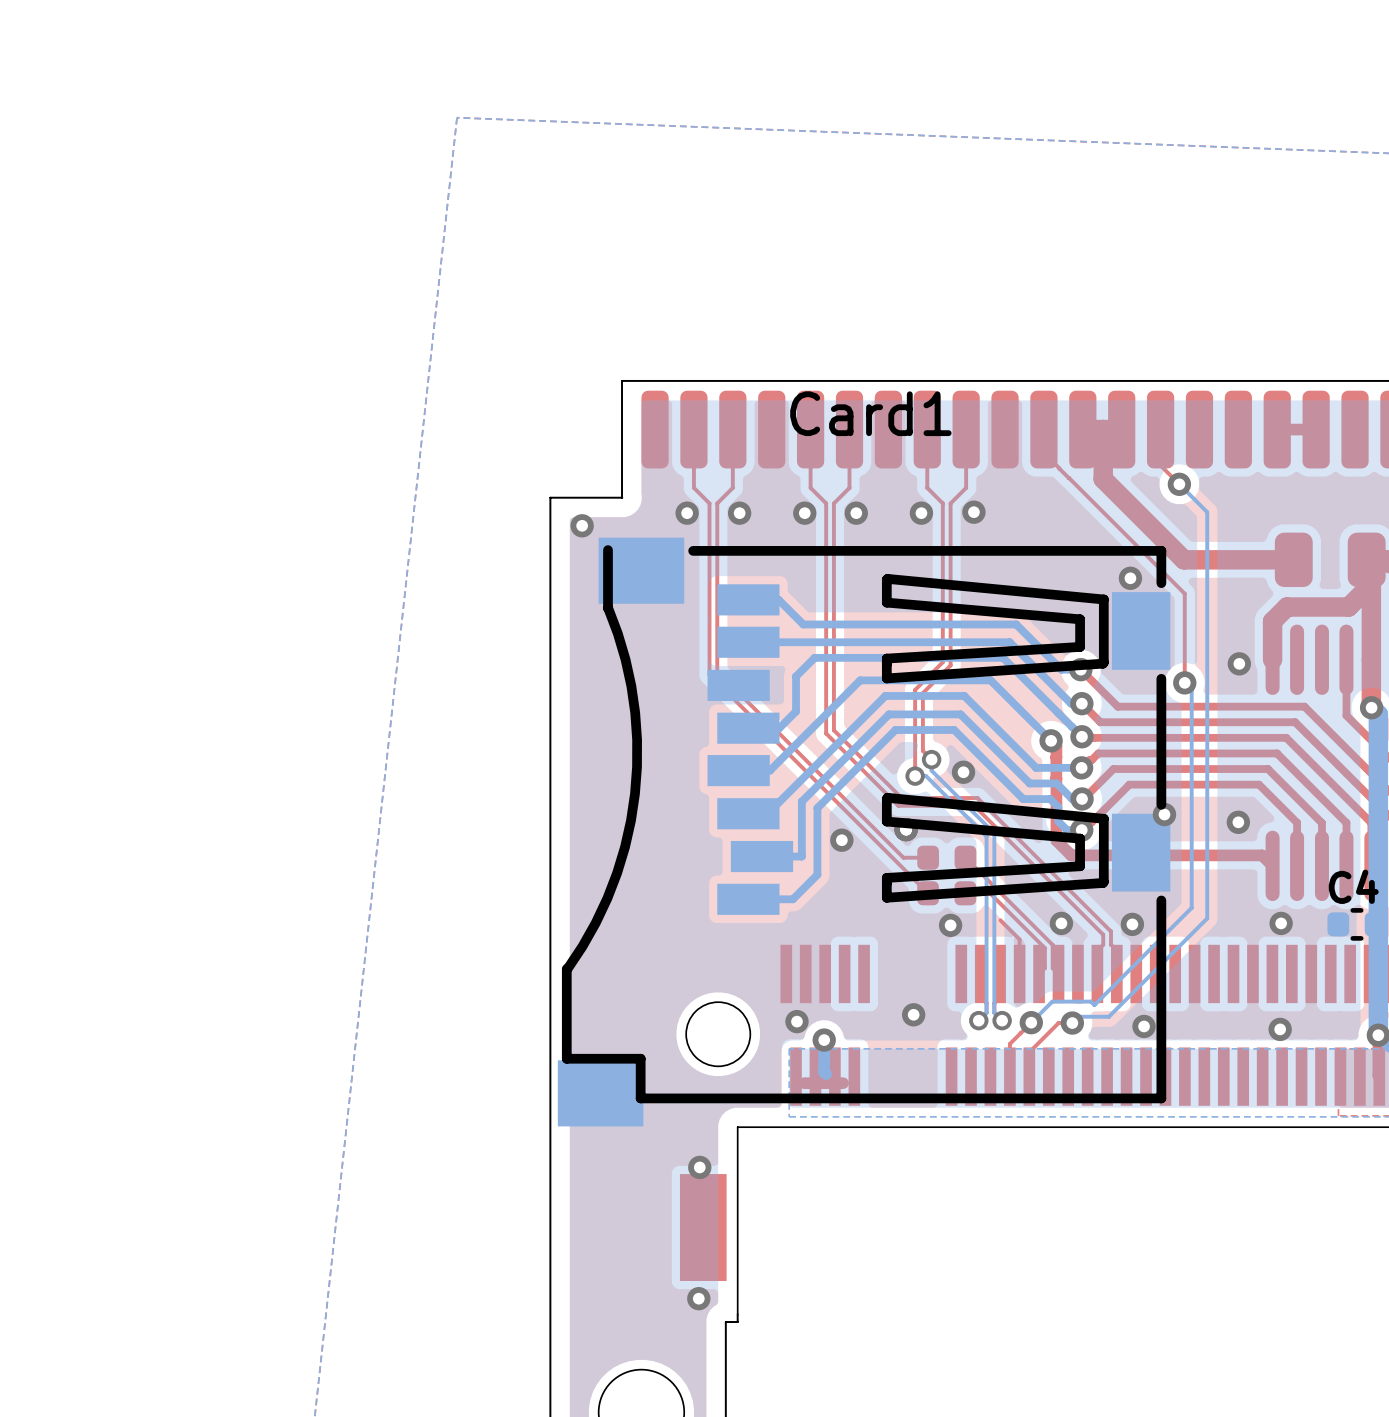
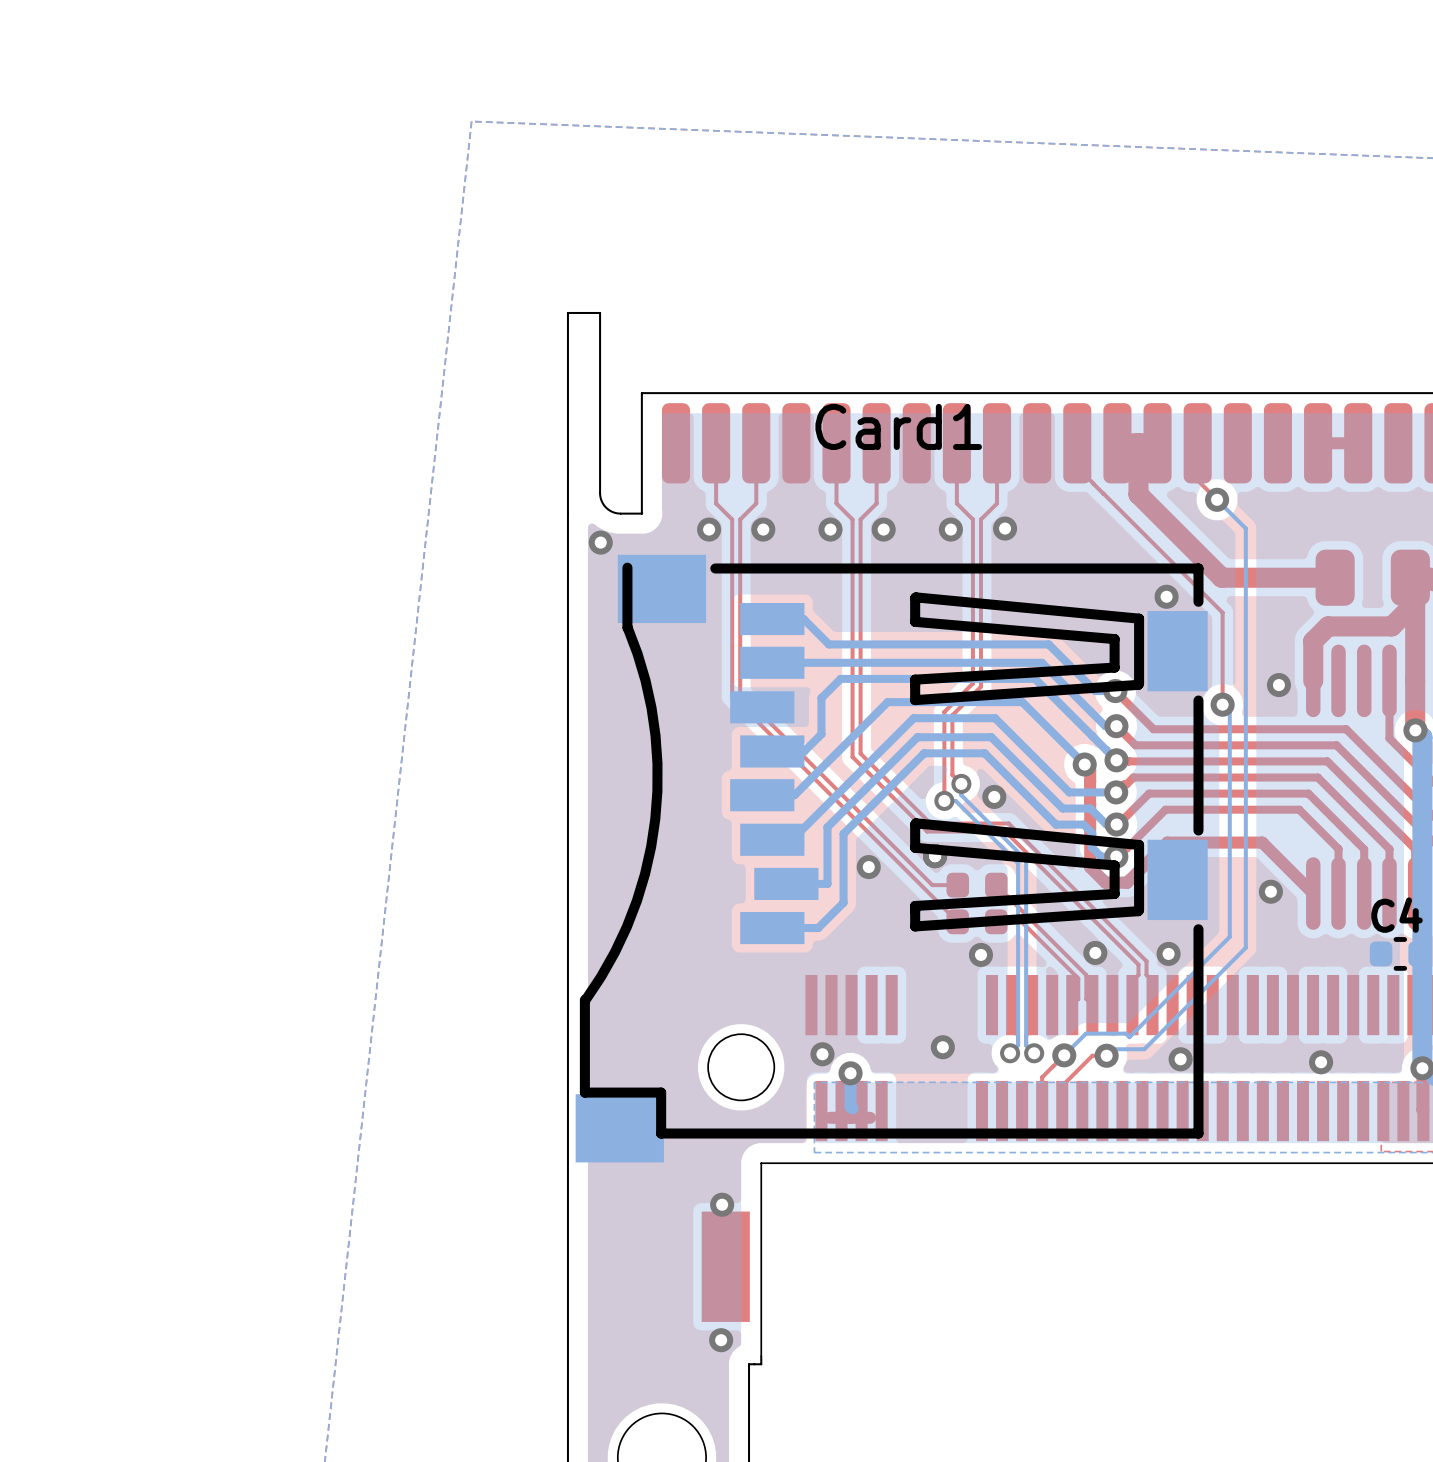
board edge: (601, 497) (550, 497) -> (620, 513) (612, 512) (606, 507) (600, 495) (600, 312) (567, 312) (567, 513)
via: (1164, 814) -> none
via: (1238, 822) -> none
top track: (1262, 855) (1092, 855) -> (1302, 882) (1262, 842) (1167, 842) (1127, 882)
via: none -> (1270, 891)
top track: (1000, 920) (1019, 939) (1019, 973) -> none
via: (1281, 923) -> none

